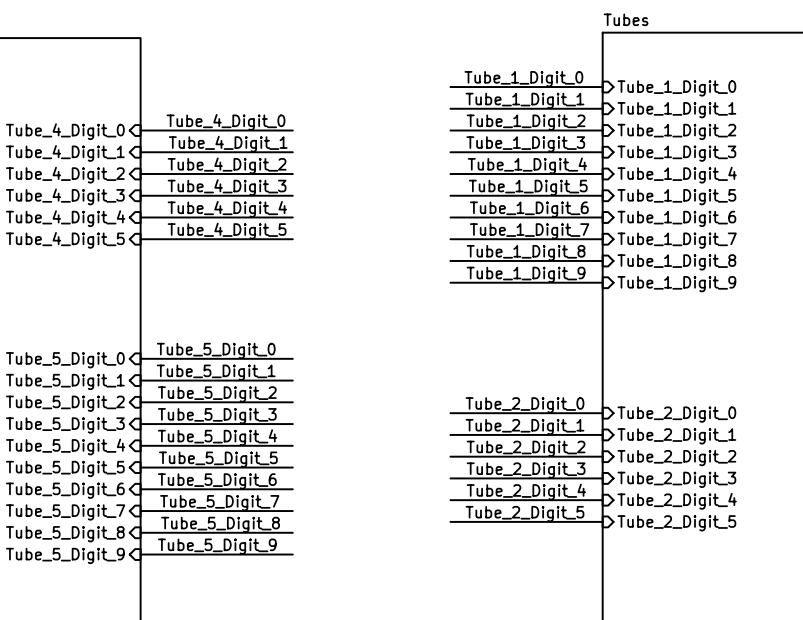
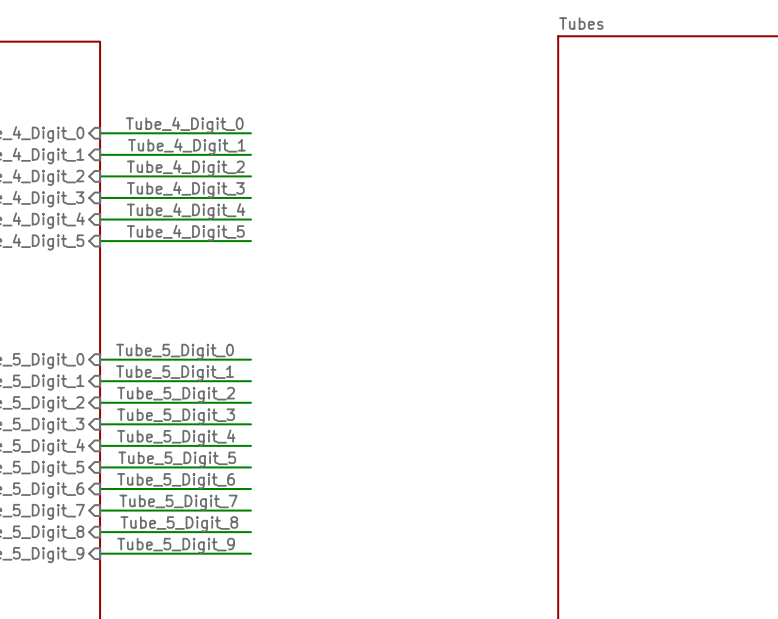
label: Tube_1_Digit_0 (523, 79) -> none
wire: (450, 87) (602, 87) -> none
sheet pin: Tube_1_Digit_0 (676, 88) -> none
label: Tube_1_Digit_1 (524, 100) -> none
wire: (450, 108) (602, 108) -> none
sheet pin: Tube_1_Digit_1 (676, 110) -> none
label: Tube_1_Digit_2 (526, 122) -> none
wire: (450, 130) (602, 130) -> none
sheet pin: Tube_1_Digit_2 (676, 131) -> none
label: Tube_1_Digit_3 (525, 144) -> none
wire: (450, 152) (602, 152) -> none
sheet pin: Tube_1_Digit_3 (676, 153) -> none
label: Tube_1_Digit_4 (527, 165) -> none
wire: (450, 174) (602, 174) -> none
sheet pin: Tube_1_Digit_4 (677, 175) -> none
label: Tube_1_Digit_5 (528, 187) -> none
wire: (450, 195) (602, 195) -> none
sheet pin: Tube_1_Digit_5 (676, 197) -> none
label: Tube_1_Digit_6 (529, 209) -> none
wire: (450, 217) (602, 217) -> none
sheet pin: Tube_1_Digit_6 (676, 218) -> none
label: Tube_1_Digit_7 (529, 231) -> none
wire: (450, 239) (602, 239) -> none
sheet pin: Tube_1_Digit_7 (677, 240) -> none
label: Tube_1_Digit_8 (526, 253) -> none
wire: (450, 260) (602, 260) -> none
sheet pin: Tube_1_Digit_8 (676, 262) -> none
label: Tube_1_Digit_9 (526, 274) -> none
wire: (450, 282) (602, 282) -> none
sheet pin: Tube_1_Digit_9 (676, 284) -> none
label: Tube_2_Digit_0 (524, 405) -> none
wire: (450, 413) (602, 413) -> none
sheet pin: Tube_2_Digit_0 (676, 414) -> none
label: Tube_2_Digit_1 (524, 427) -> none
wire: (450, 434) (602, 434) -> none
sheet pin: Tube_2_Digit_1 (676, 436) -> none
label: Tube_2_Digit_2 (526, 448) -> none
wire: (450, 456) (602, 456) -> none
sheet pin: Tube_2_Digit_2 (676, 458) -> none
label: Tube_2_Digit_3 (526, 470) -> none
wire: (450, 478) (602, 478) -> none
sheet pin: Tube_2_Digit_3 (676, 479) -> none
label: Tube_2_Digit_4 (526, 492) -> none
wire: (450, 500) (602, 500) -> none
sheet pin: Tube_2_Digit_4 (677, 501) -> none
label: Tube_2_Digit_5 (524, 514) -> none
wire: (450, 521) (602, 521) -> none
sheet pin: Tube_2_Digit_5 (676, 523) -> none

